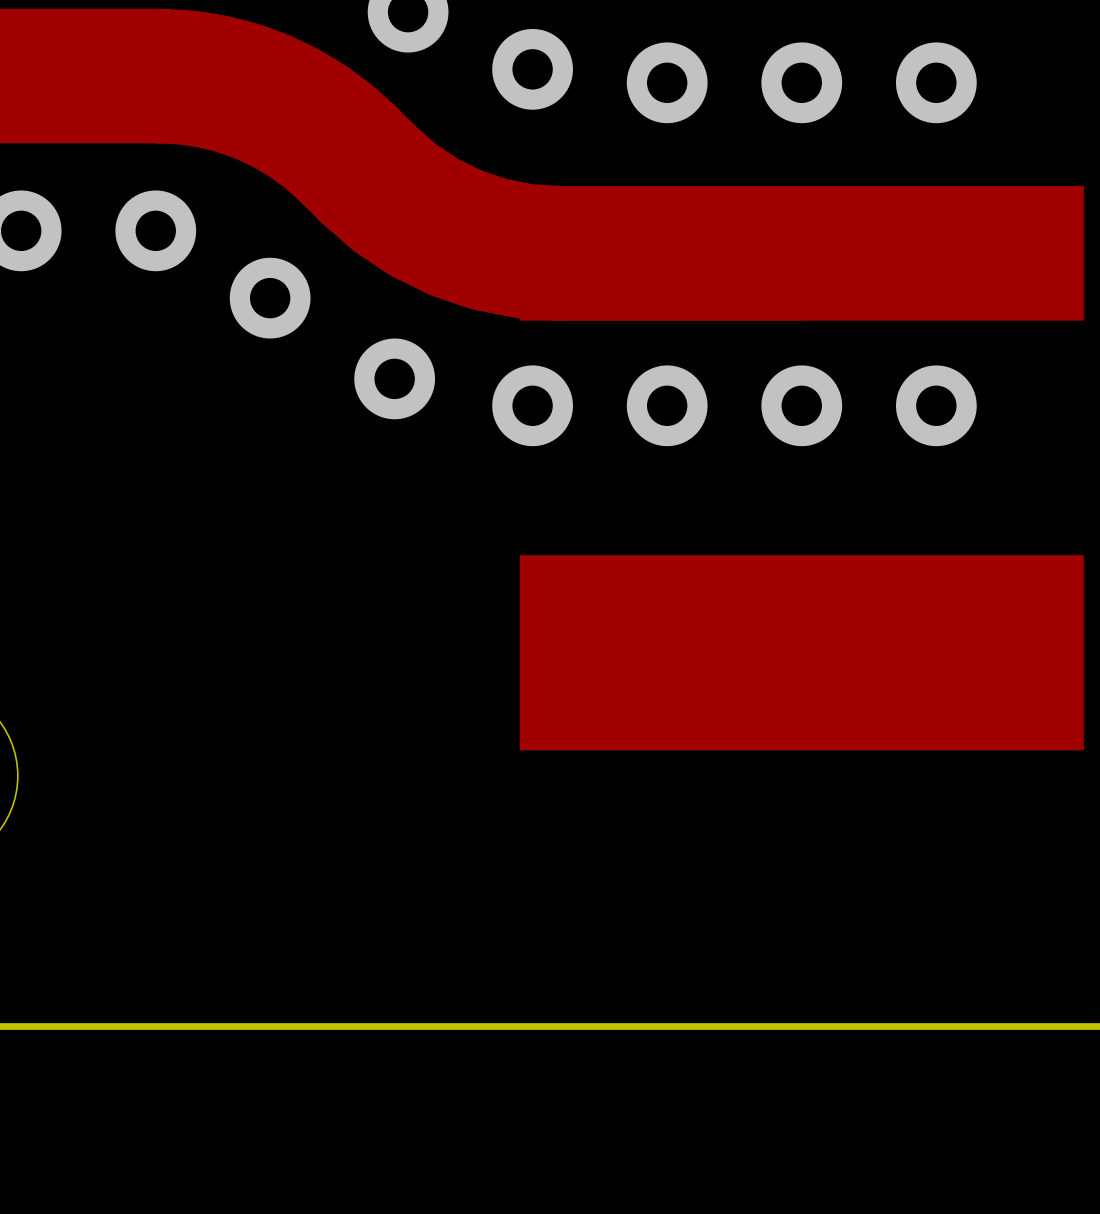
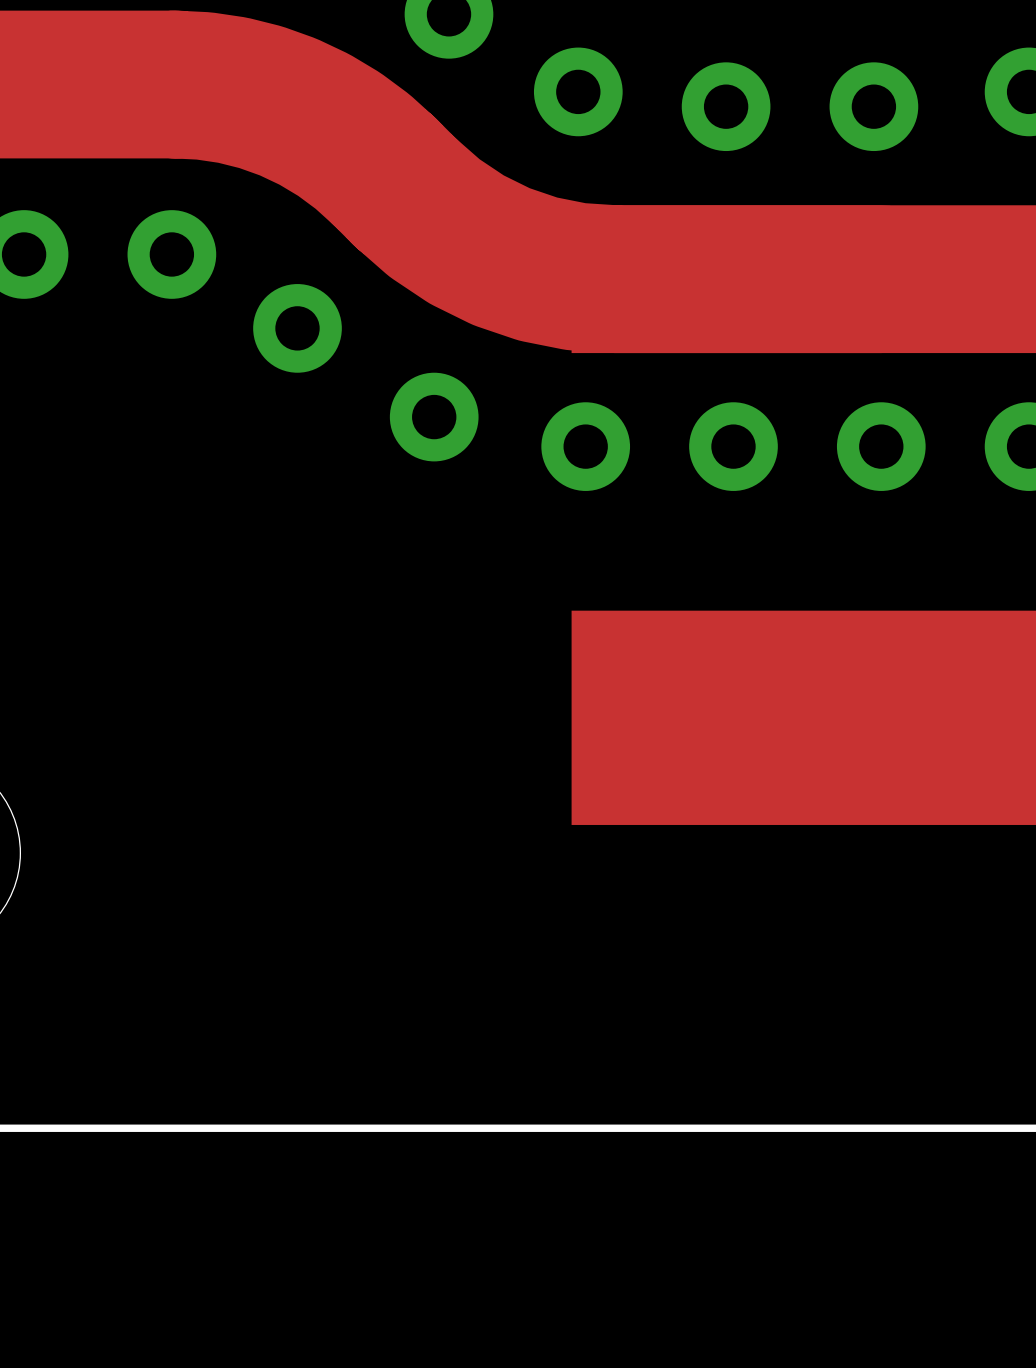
via position: (532, 69) -> (578, 91)
via position: (667, 82) -> (726, 106)
via position: (801, 82) -> (873, 106)

